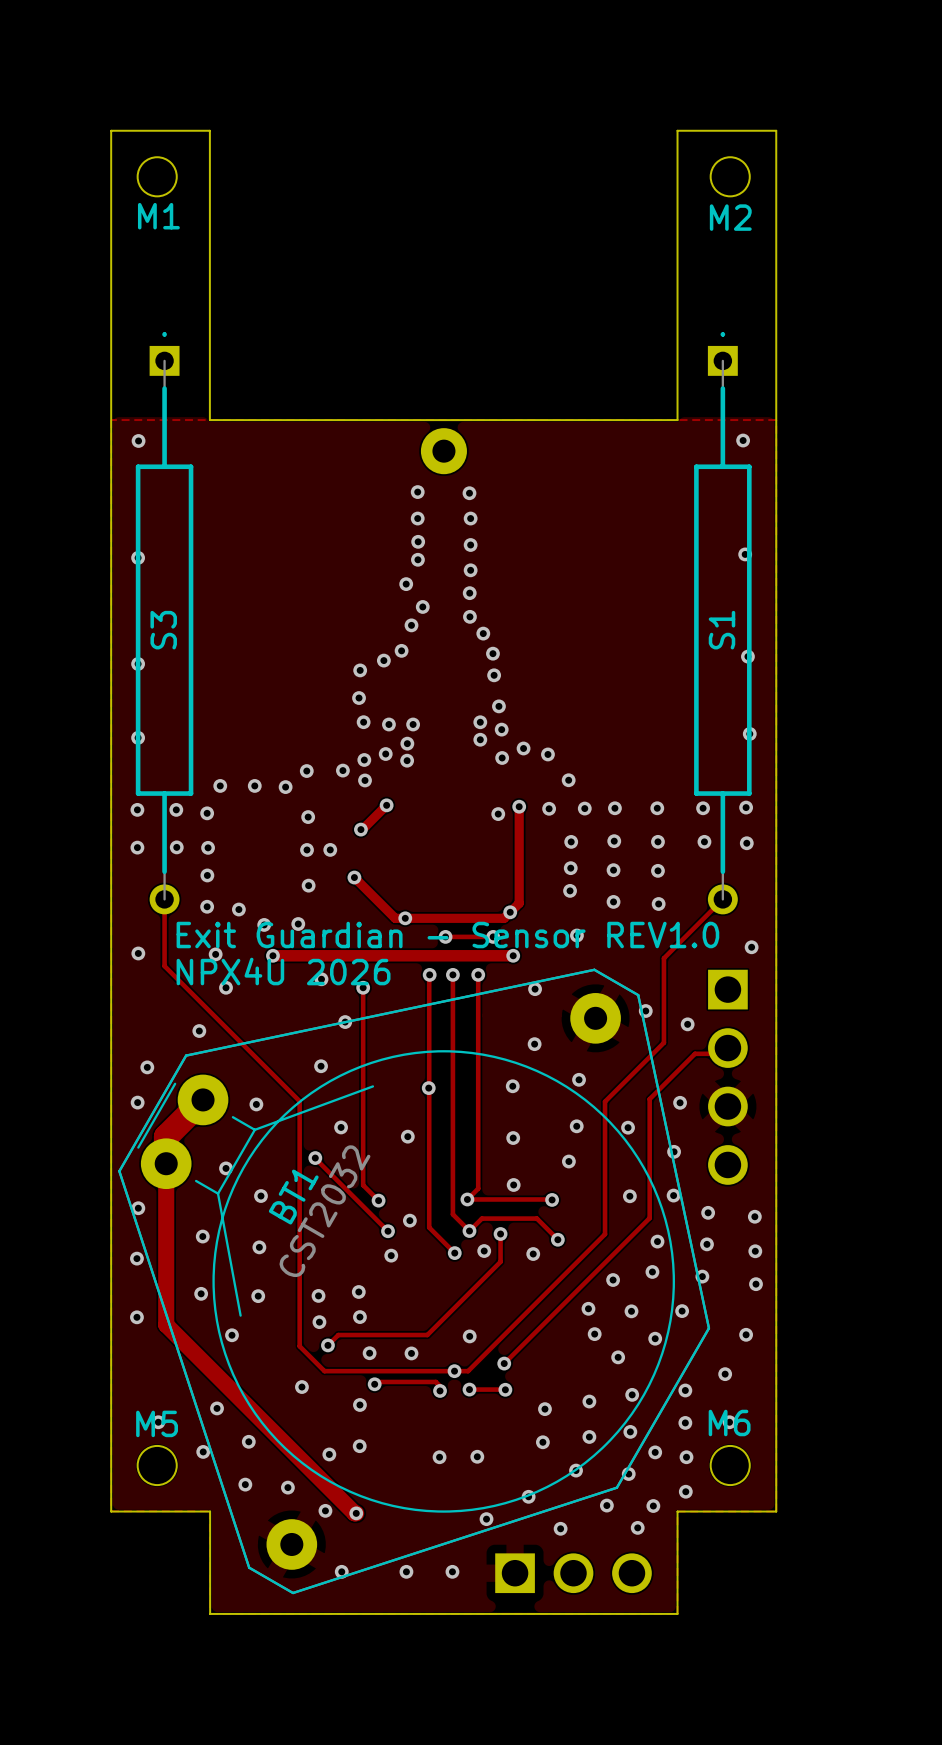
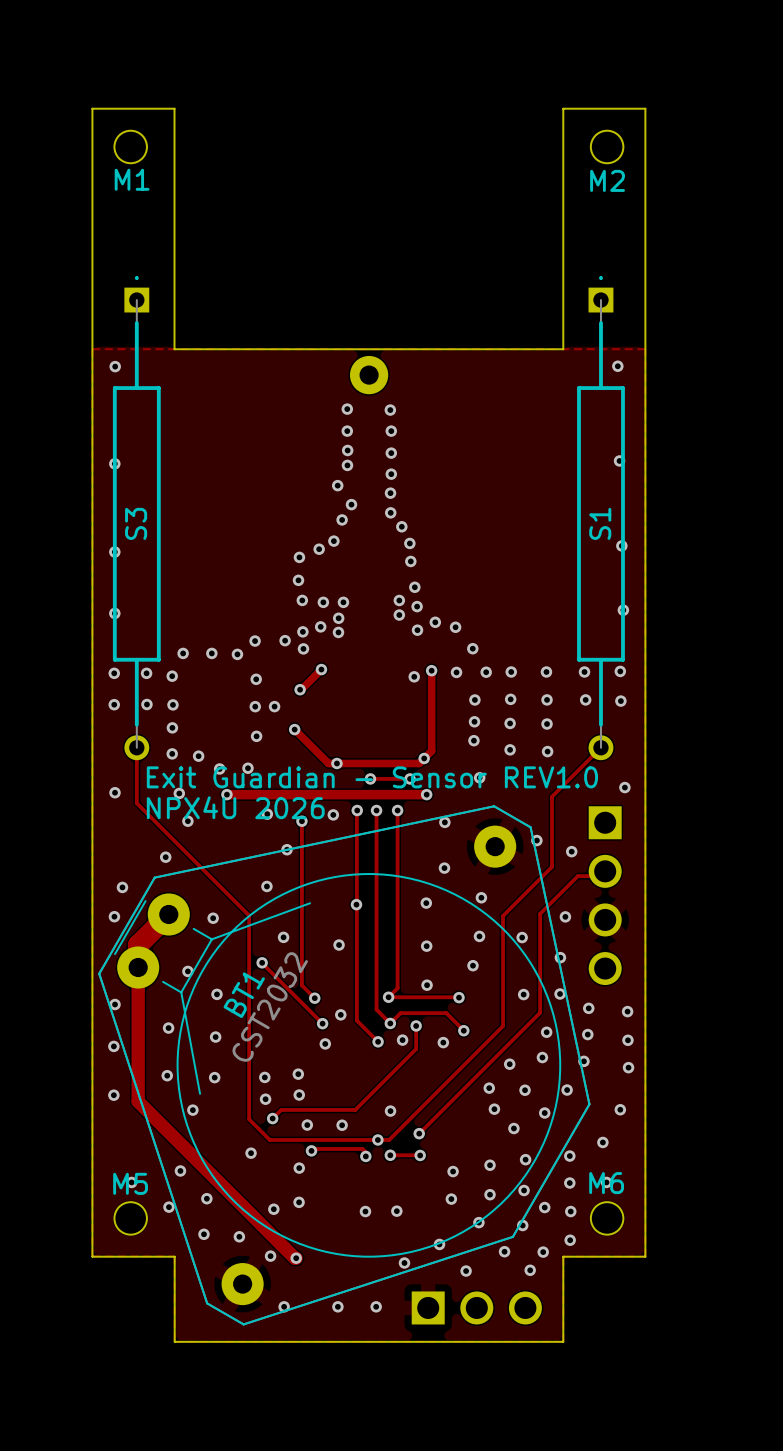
via: none -> (333, 814)

